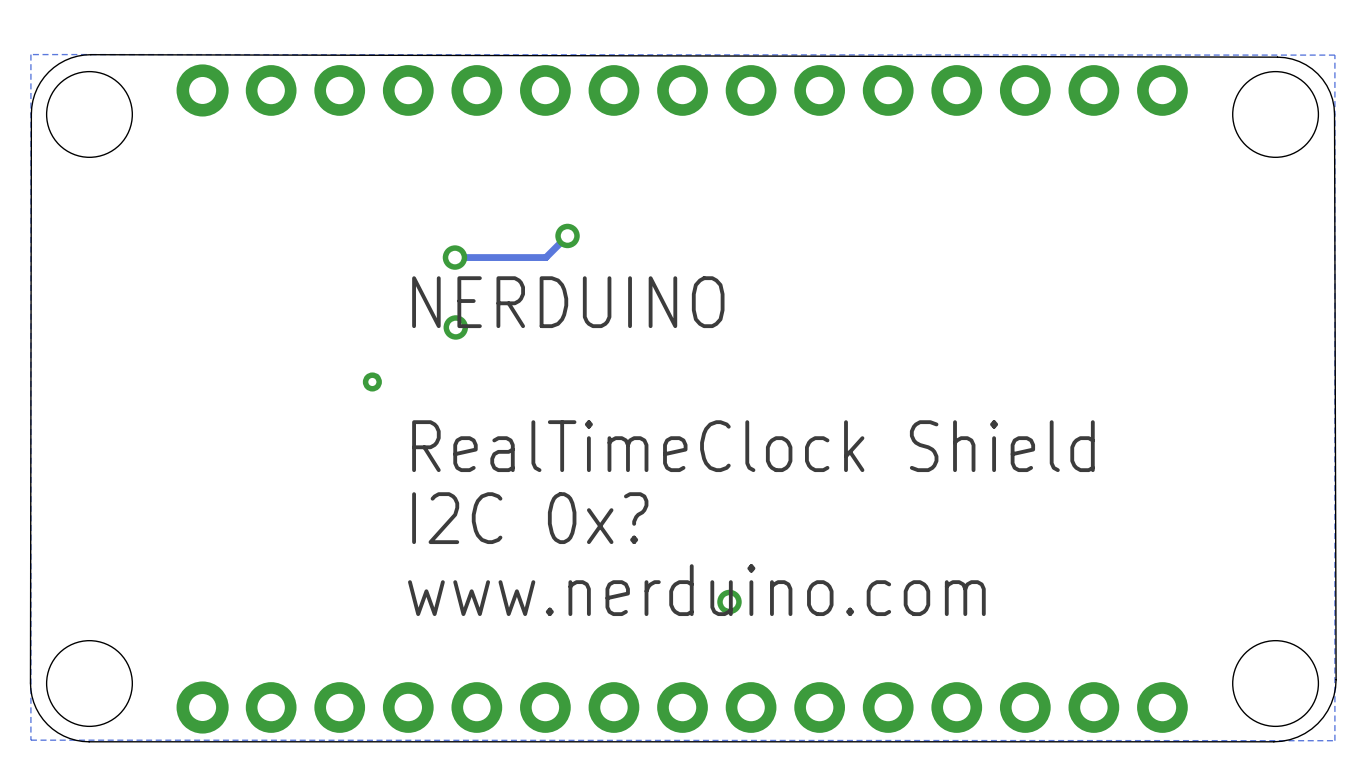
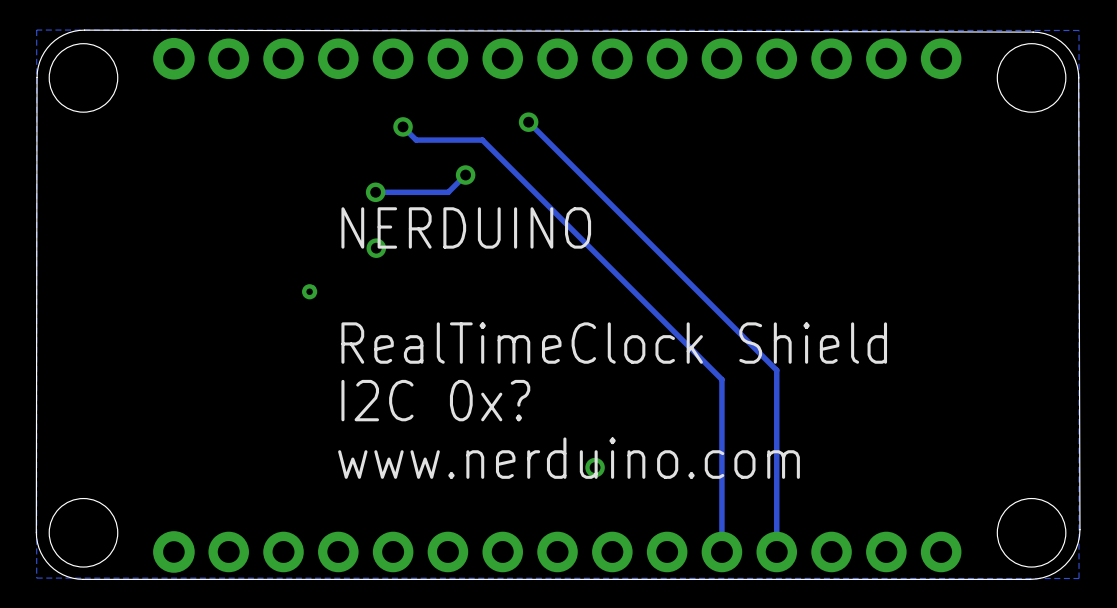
track: none -> (528, 122) (776, 370) (776, 551)
via: none -> (528, 122)
track: none -> (403, 126) (416, 140) (482, 140) (721, 379) (721, 551)
via: none -> (403, 126)

